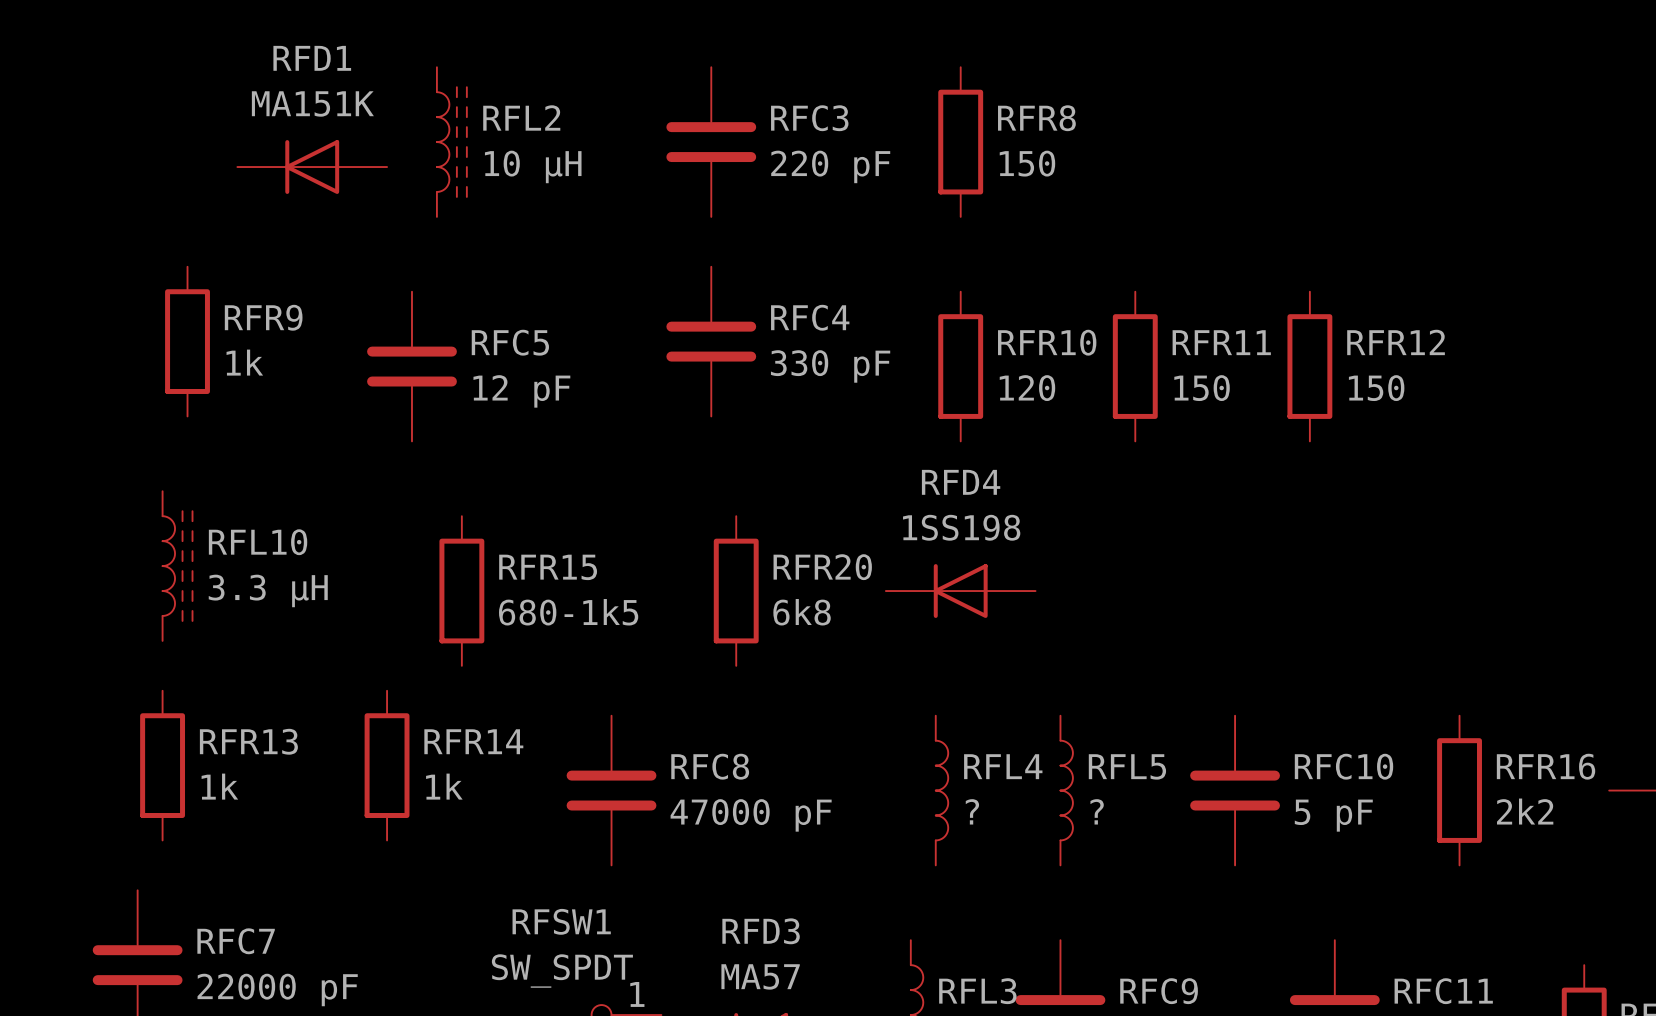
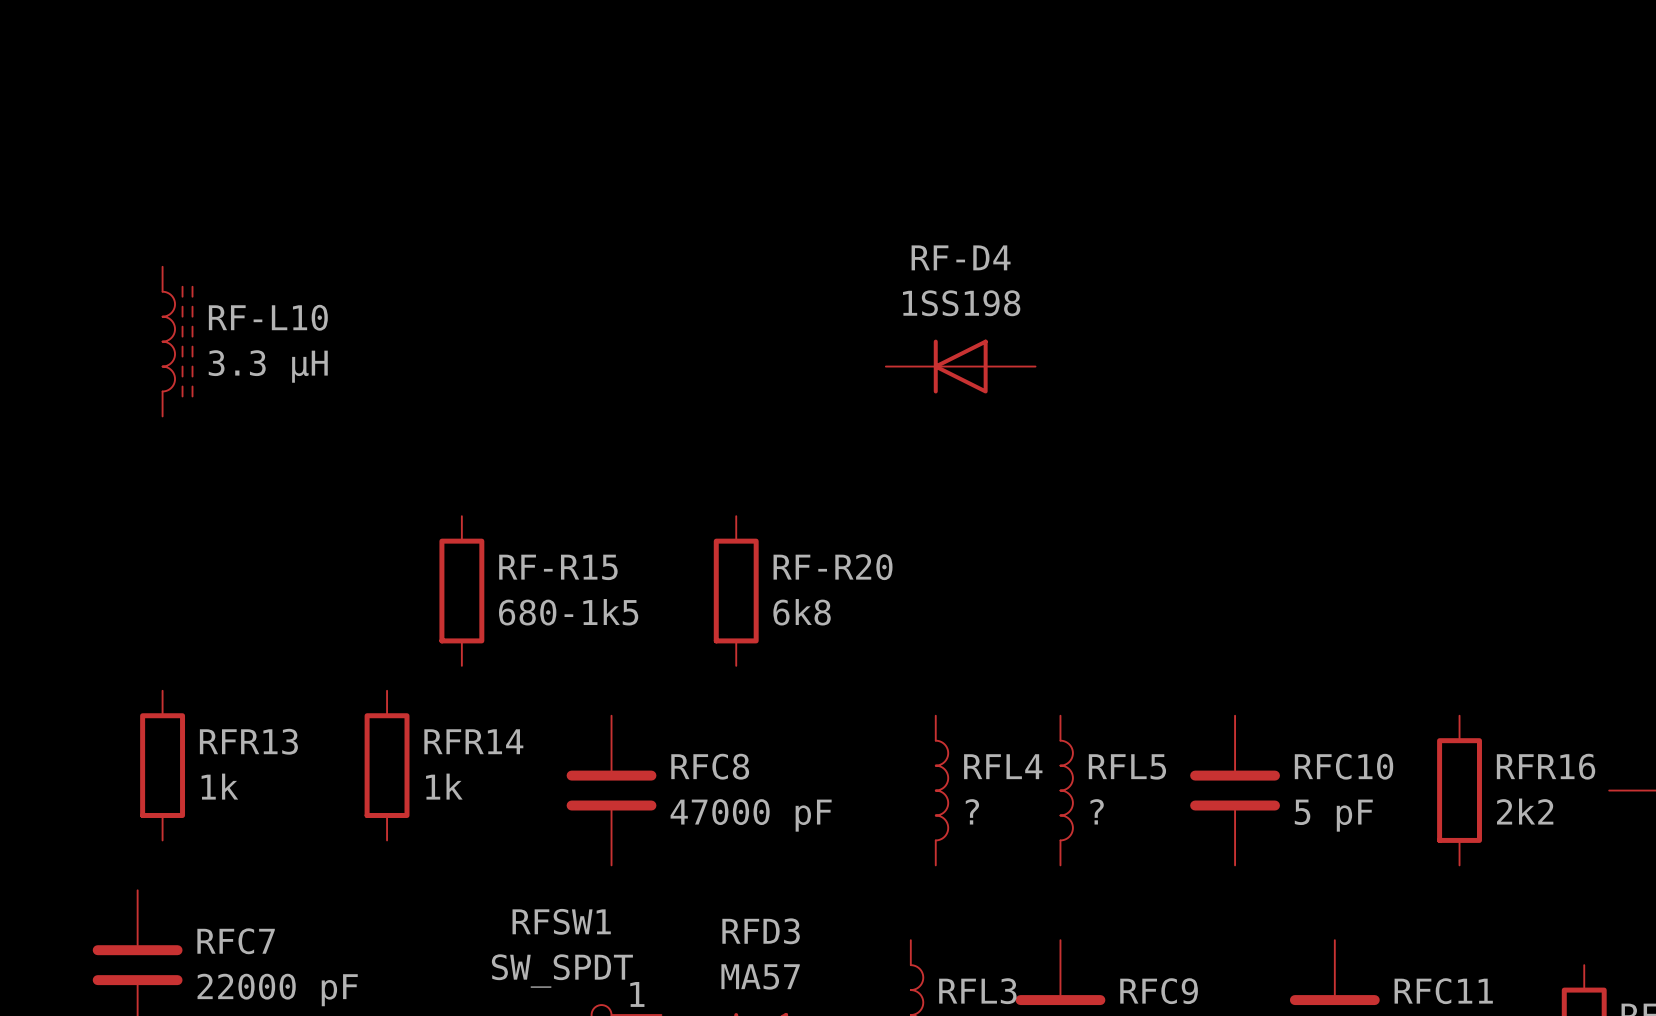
RFL2: 10 μH (451, 142) -> none
RFC3: 220 pF (711, 142) -> none
RFR8: 150 (960, 142) -> none
RFD1: MA151K (312, 167) -> none
RF-L10: none -> 3.3 μH (177, 341)
RFR9: 1k (187, 341) -> none
RFC4: 330 pF (711, 341) -> none
RFC5: 12 pF (411, 366) -> none
RFR10: 120 (960, 366) -> none
RF-D4: none -> 1SS198 (960, 366)
RFR11: 150 (1135, 366) -> none
RFR12: 150 (1309, 366) -> none
RFL10: 3.3 μH (177, 566) -> none
RFR15 name: RFR15 (548, 567) -> RF-R15 (558, 567)
RFR20 name: RFR20 (822, 567) -> RF-R20 (833, 567)
RFD4: 1SS198 (960, 591) -> none

